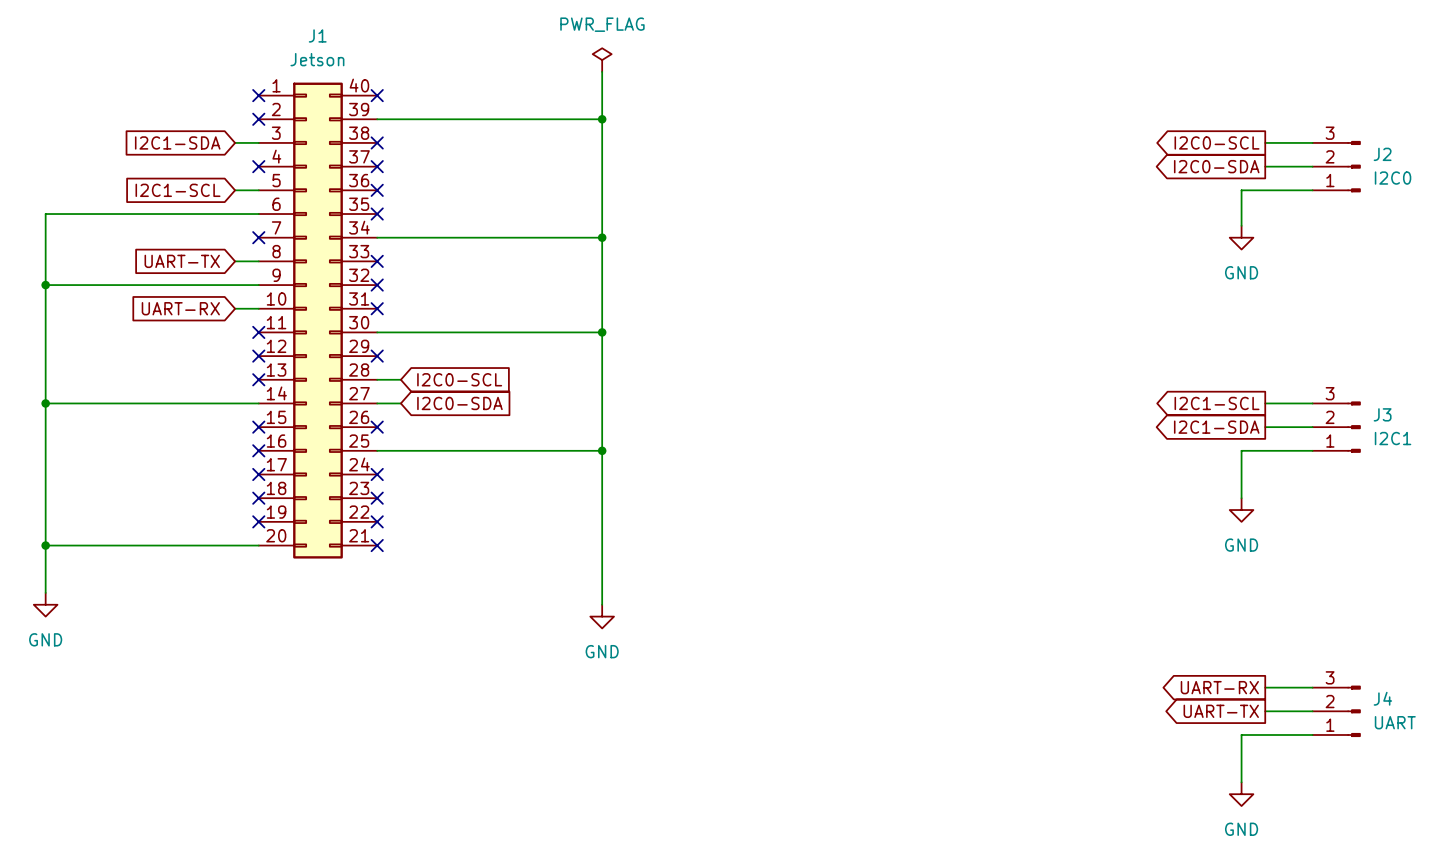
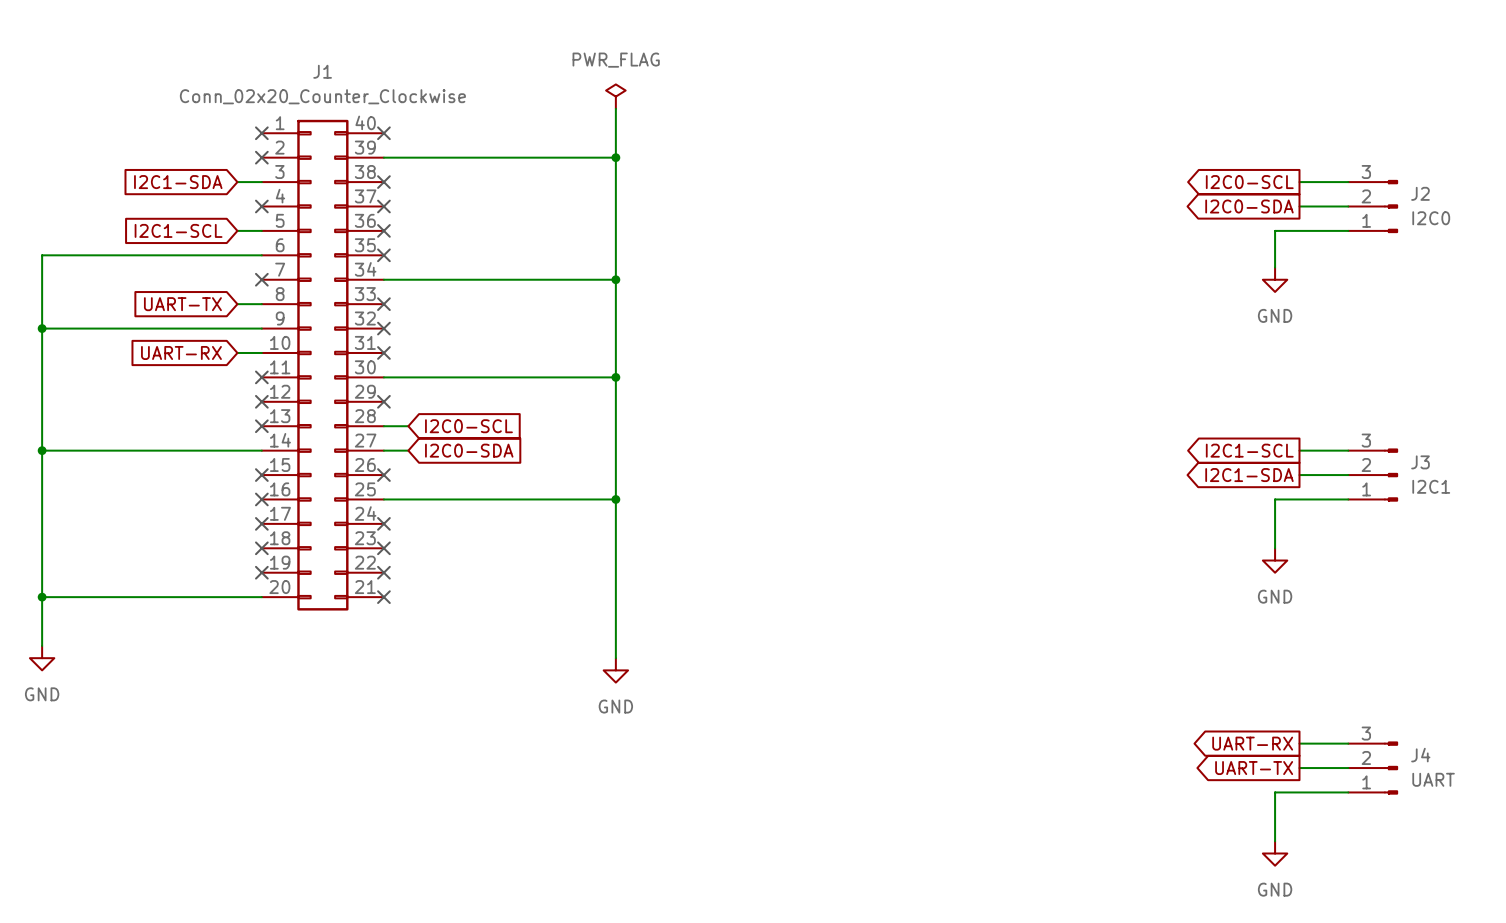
J1 value: Jetson (317, 59) -> Conn_02x20_Counter_Clockwise (322, 96)

